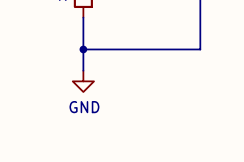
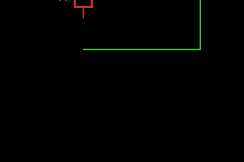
wire: (83, 17) (83, 70) -> none
junction: (83, 49) -> none
power symbol: GND (83, 81) -> none

